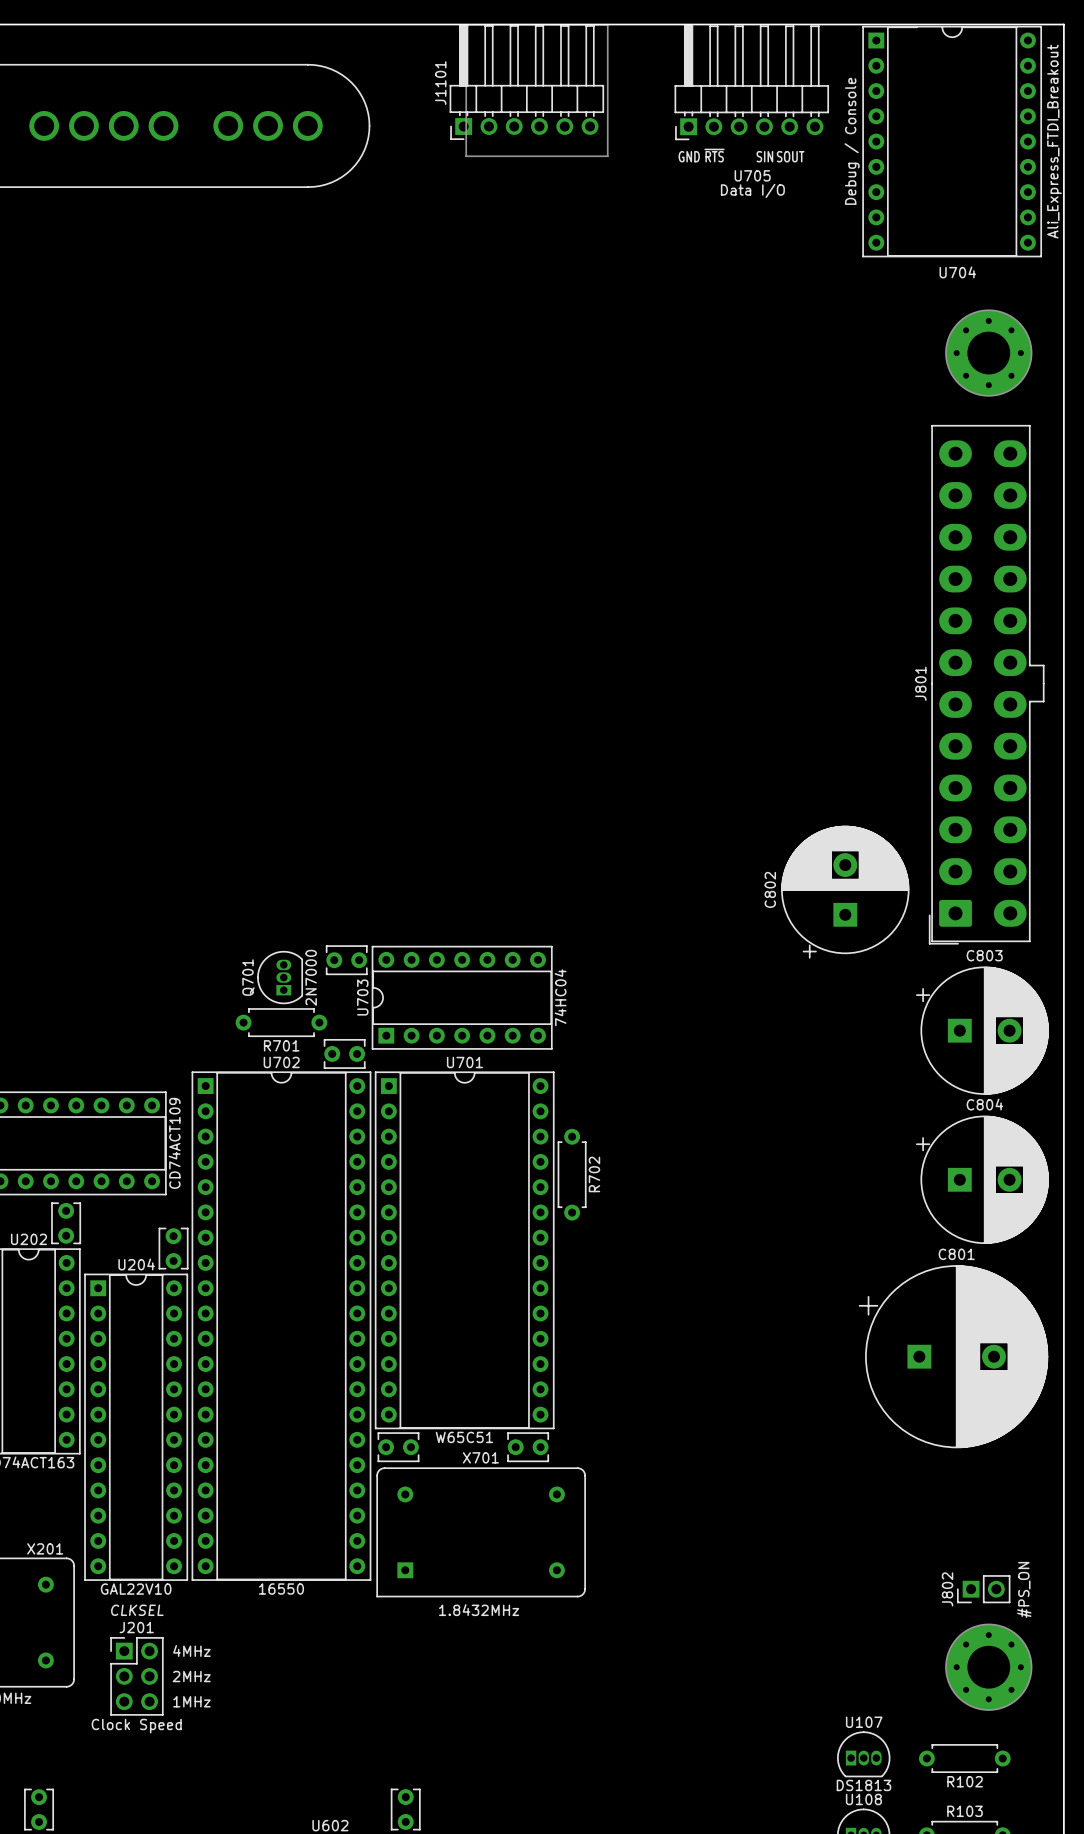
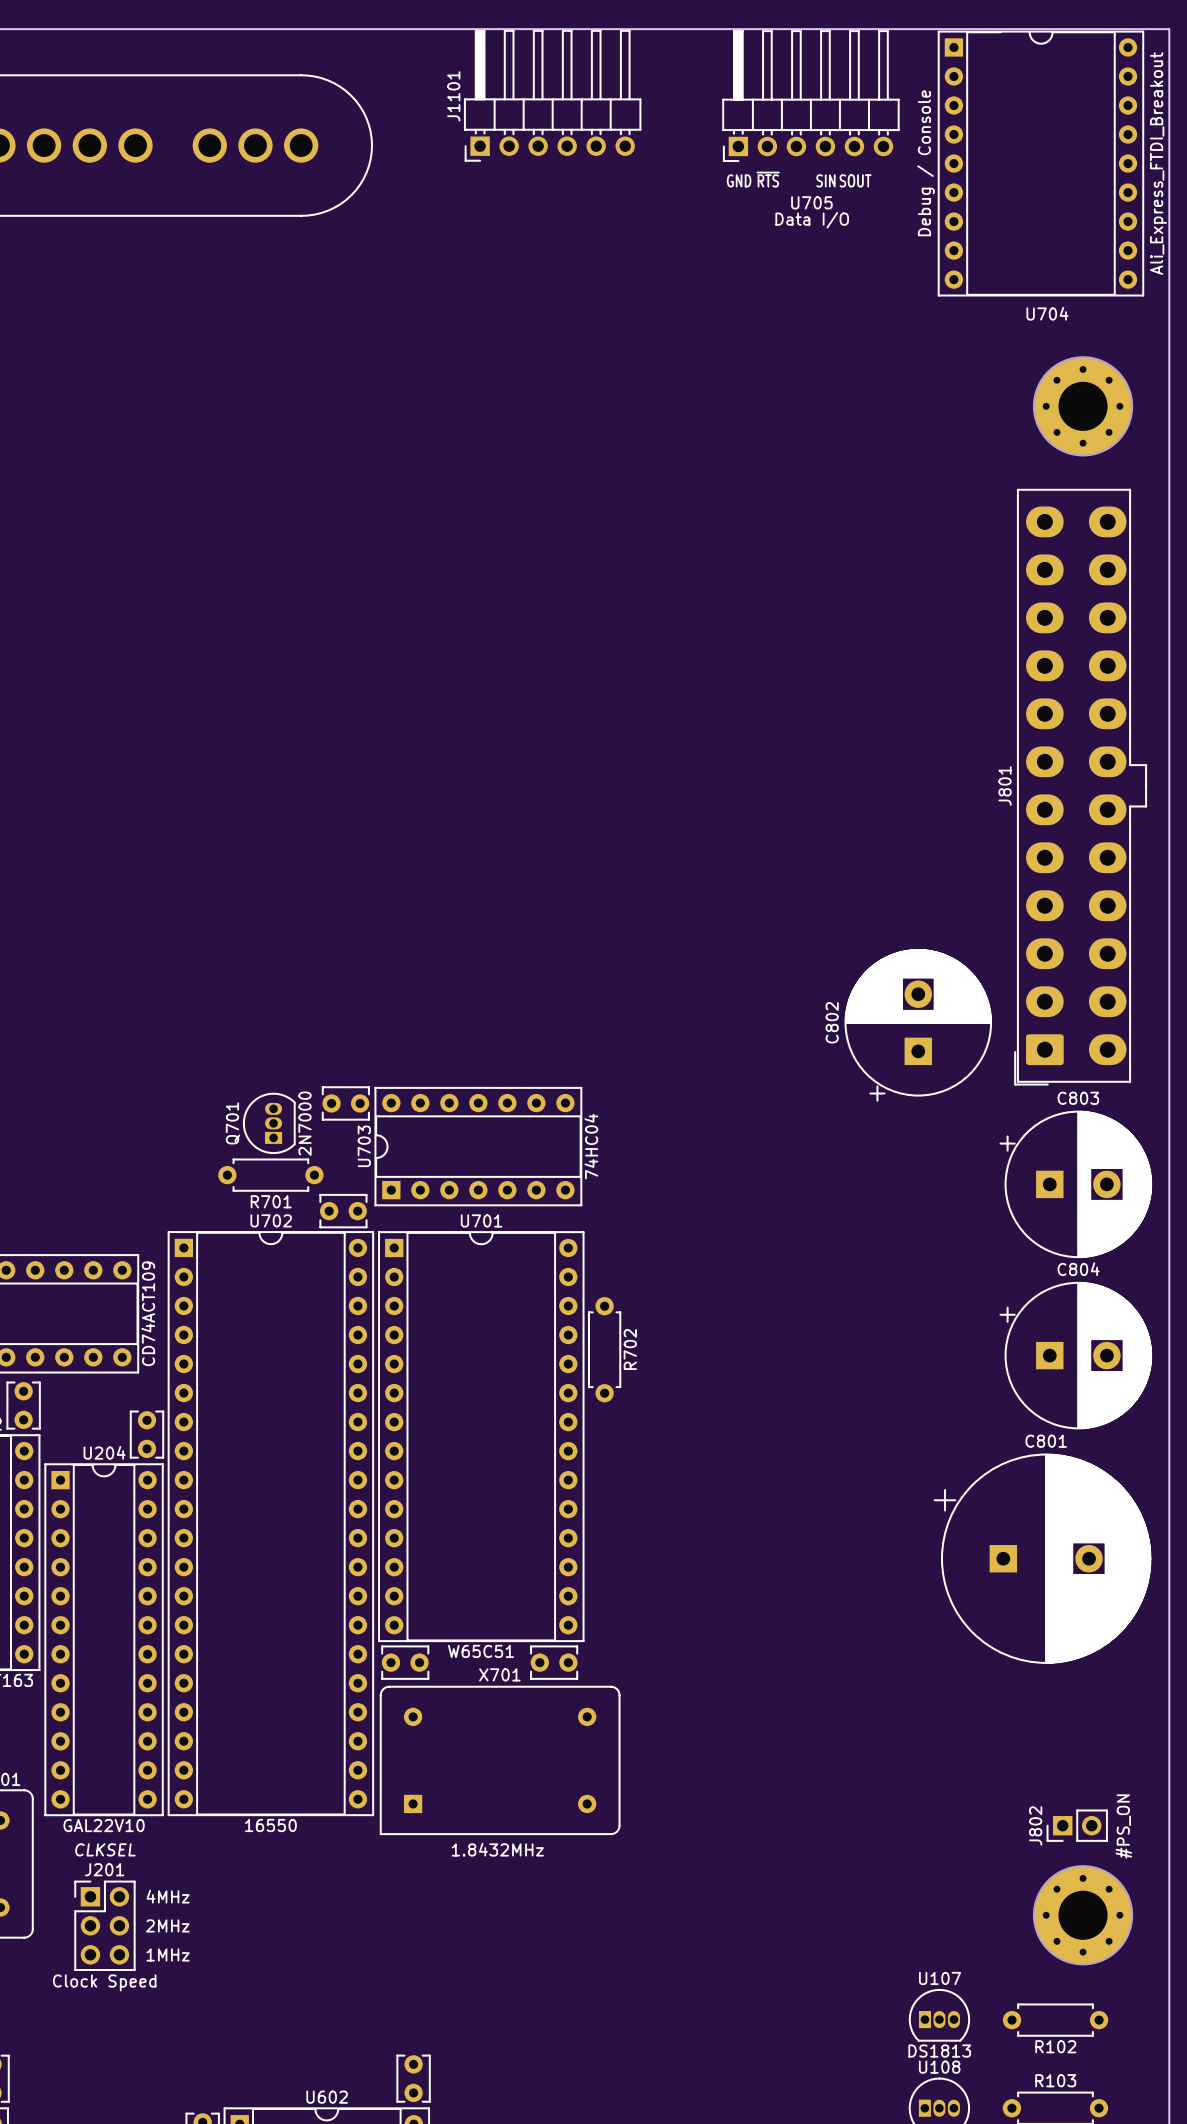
line: (466, 24) (607, 24) (607, 156) (466, 156) (466, 24) -> none

